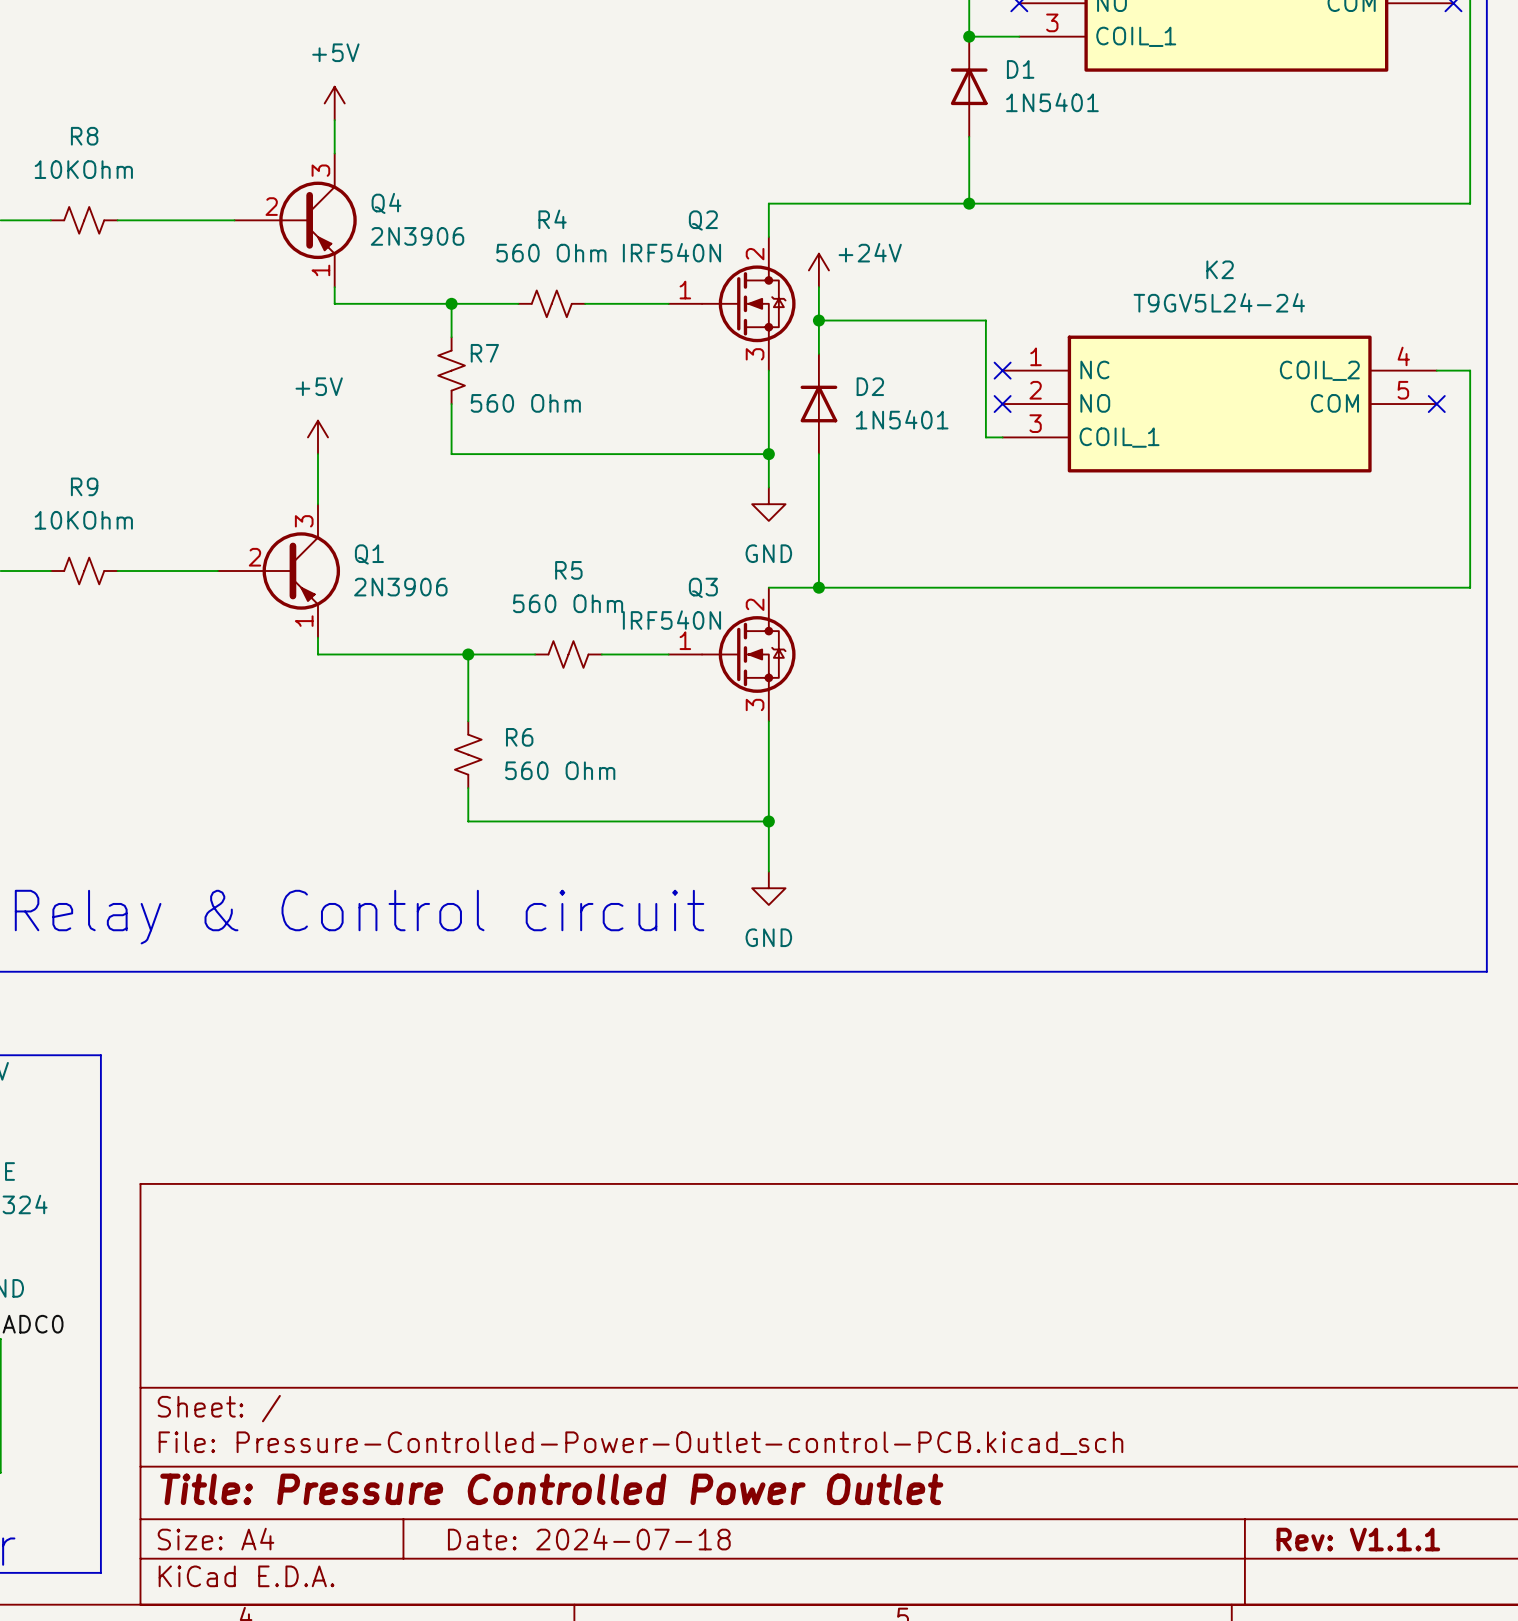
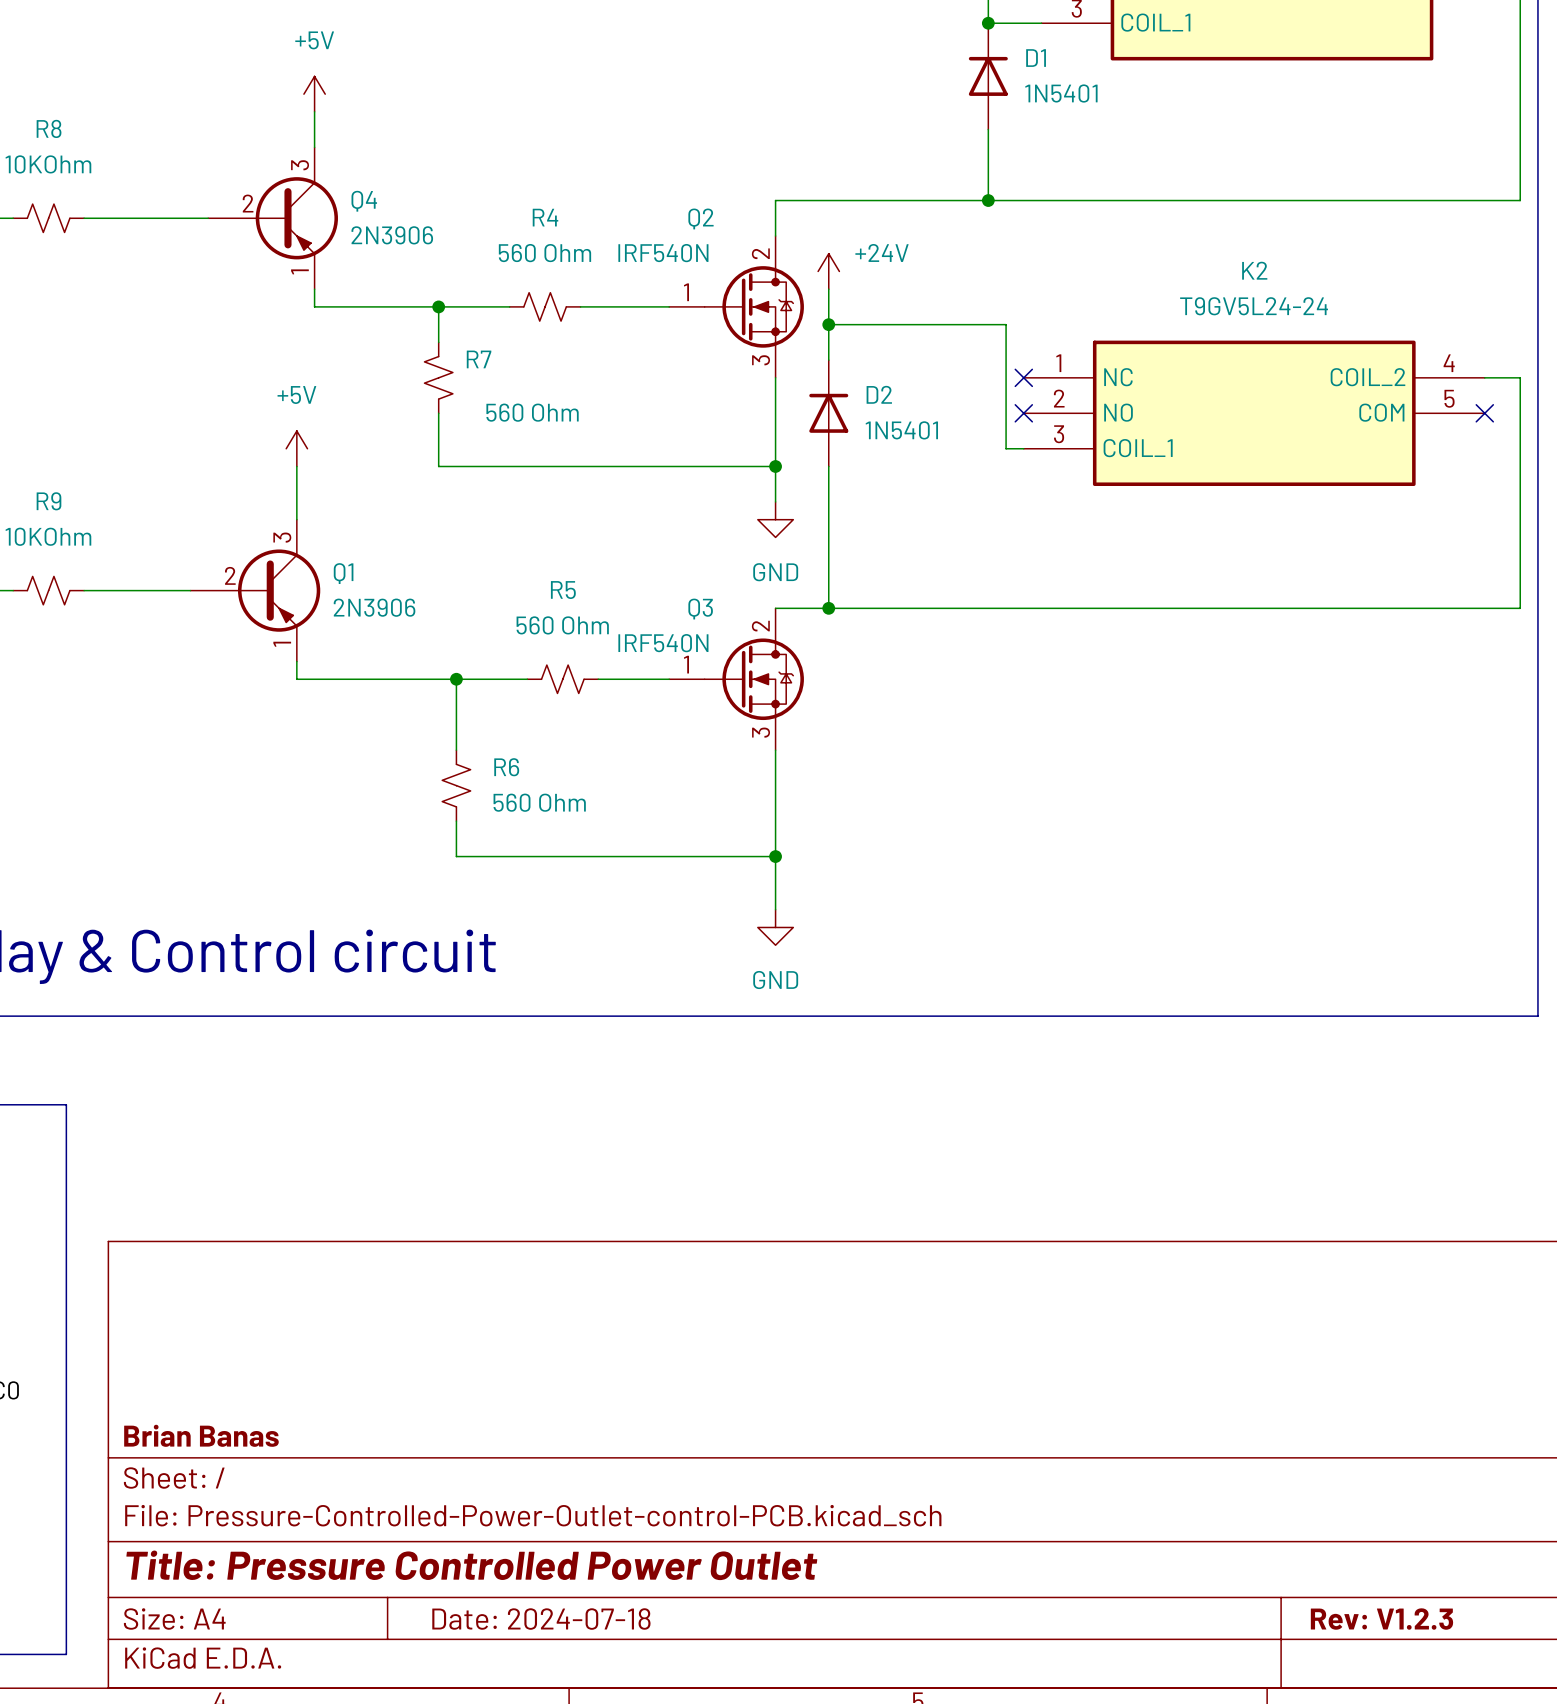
title block: none -> Brian Banas (201, 1435)
title block: Rev: V1.1.1 (1358, 1539) -> Rev: V1.2.3 (1381, 1619)

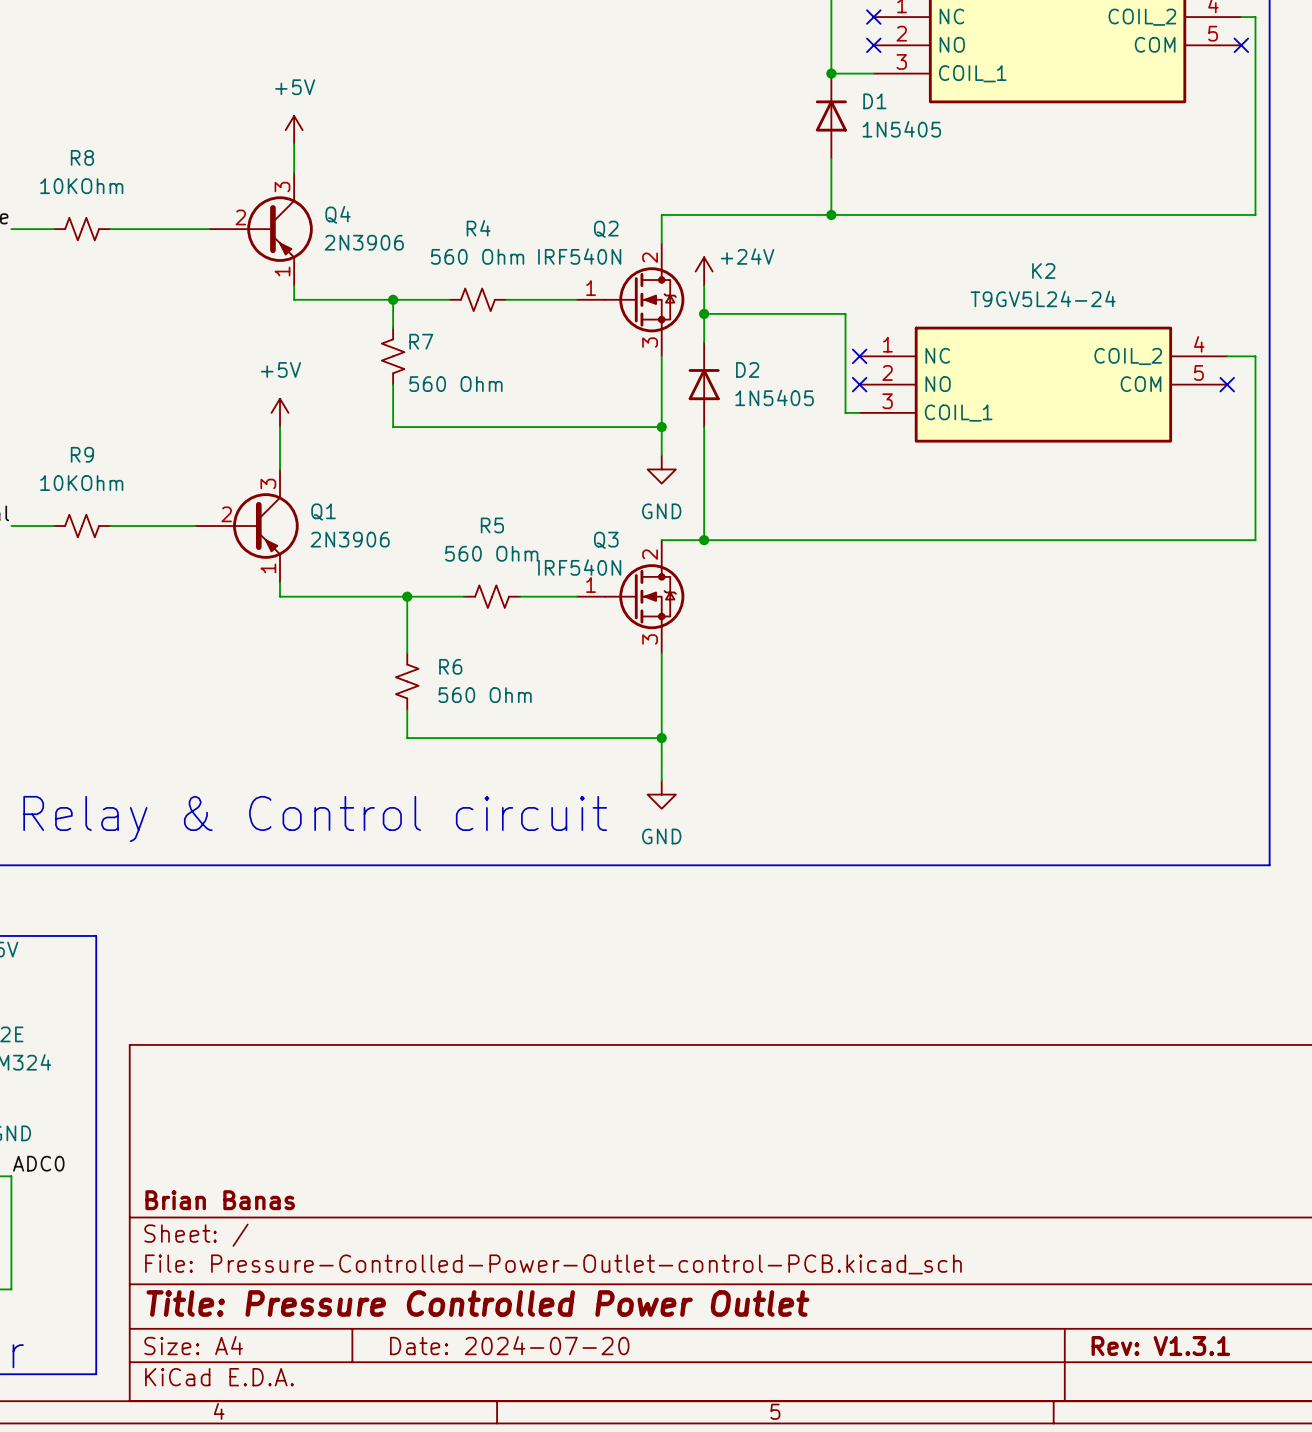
D1 value: 1N5401 (1061, 93) -> 1N5405 (901, 129)
D2 value: 1N5401 (901, 430) -> 1N5405 (774, 397)
title block: Date: 2024-07-18 (541, 1619) -> Date: 2024-07-20 (509, 1345)
title block: Rev: V1.2.3 (1381, 1619) -> Rev: V1.3.1 (1160, 1346)

